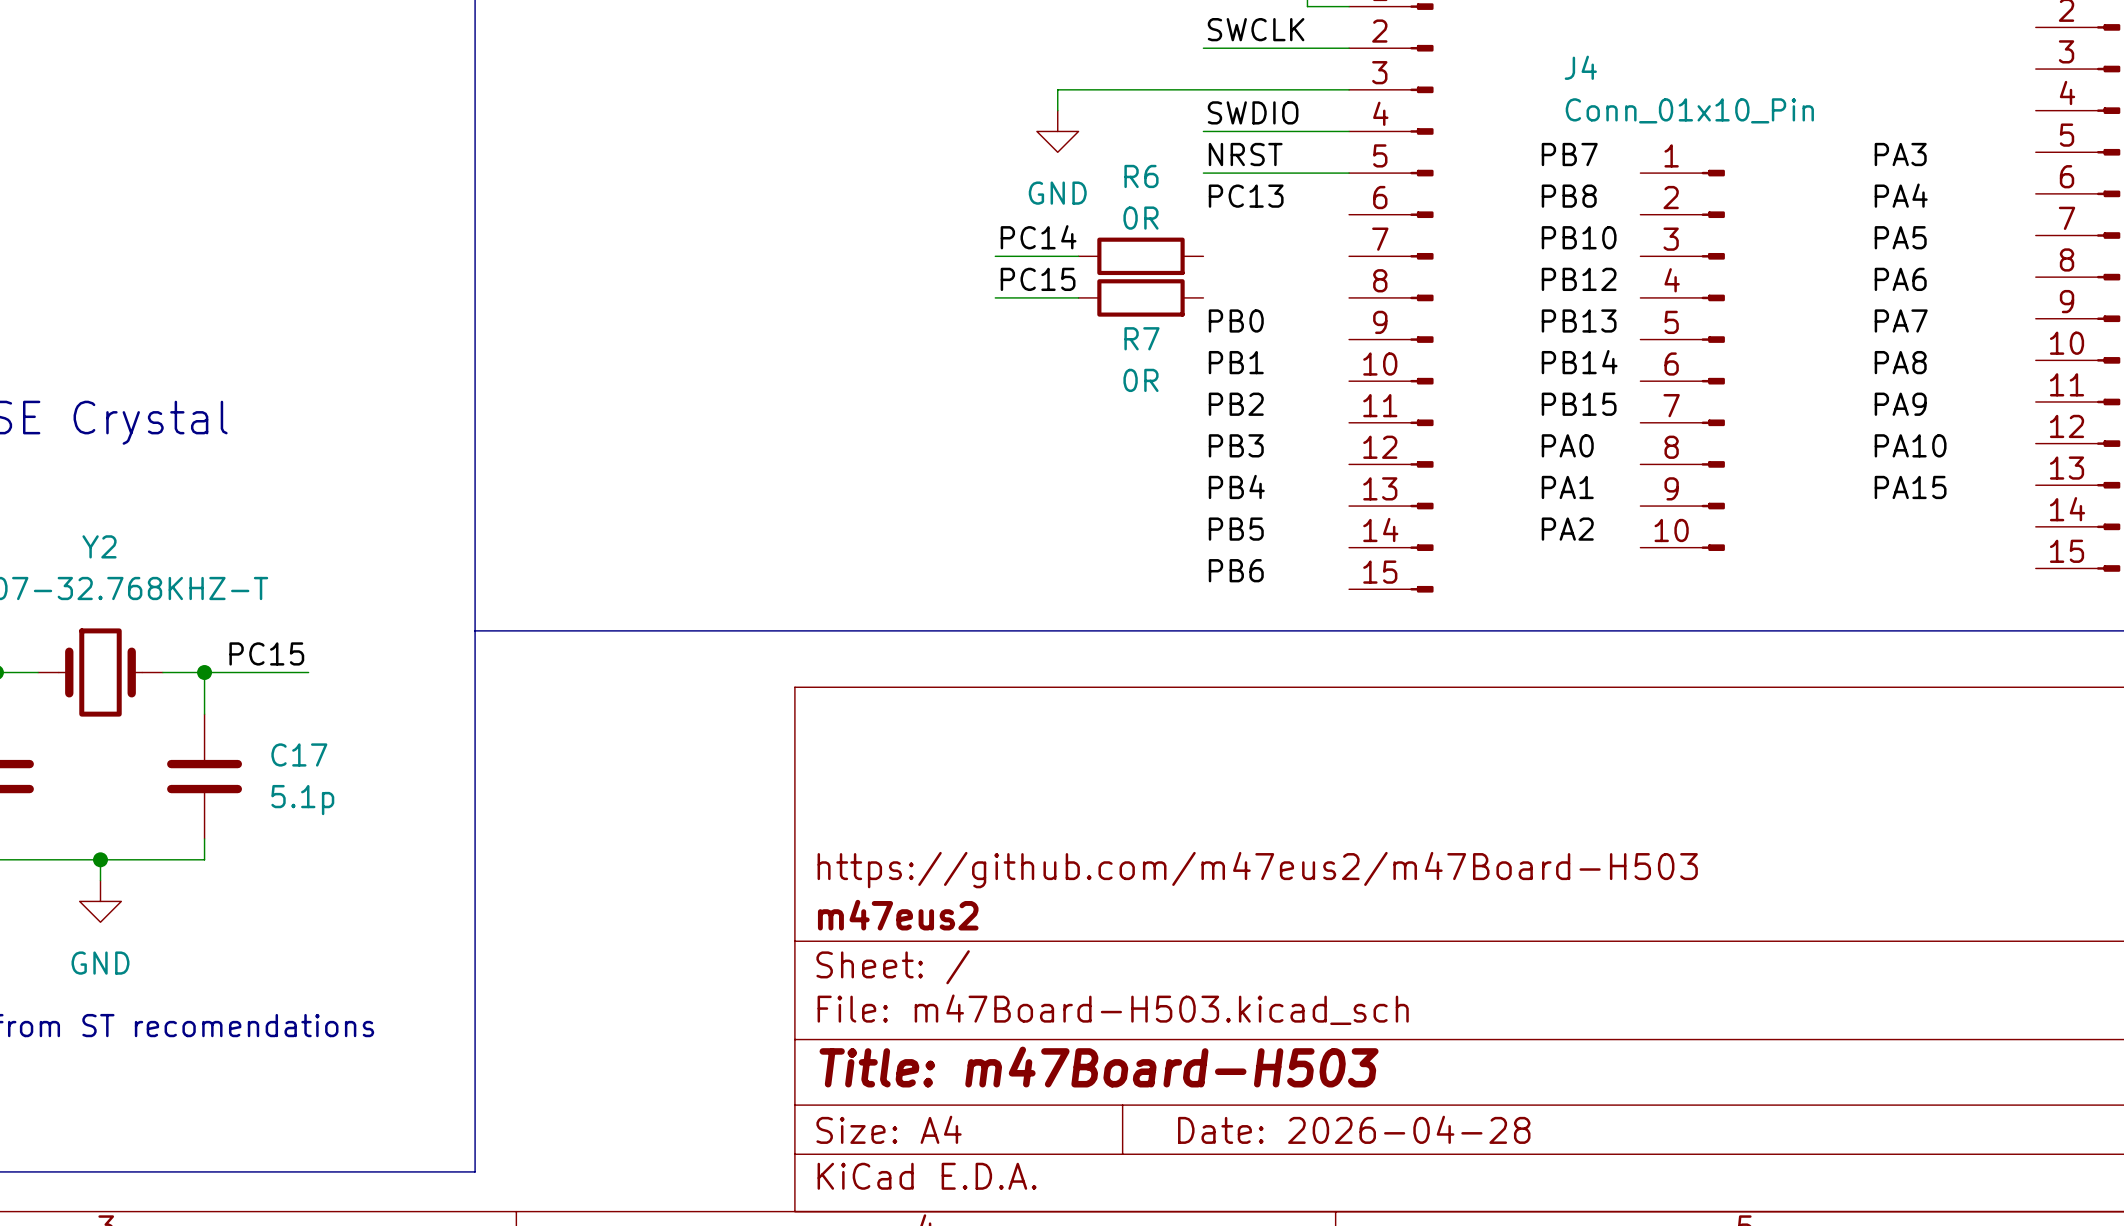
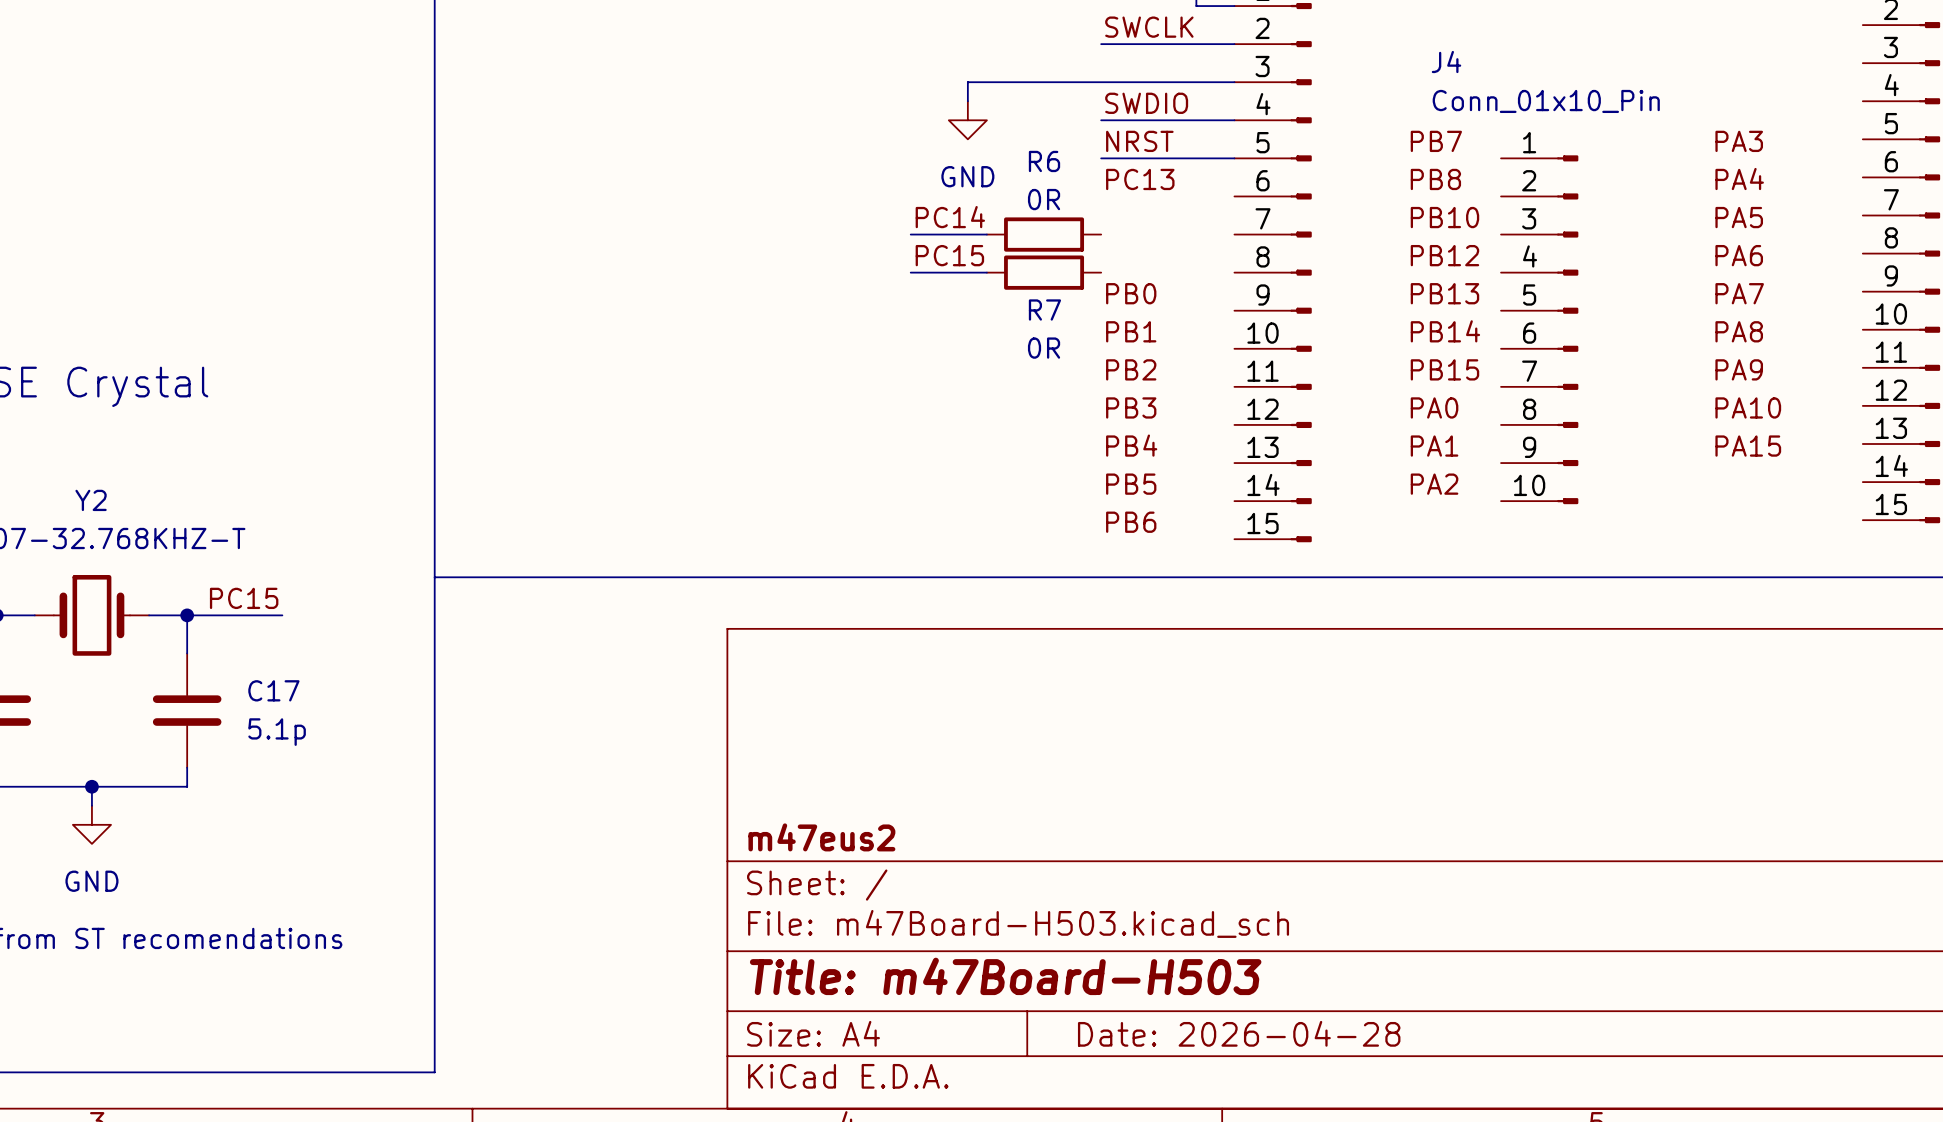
title block: https://github.com/m47eus2/m47Board-H503 (1257, 870) -> none

